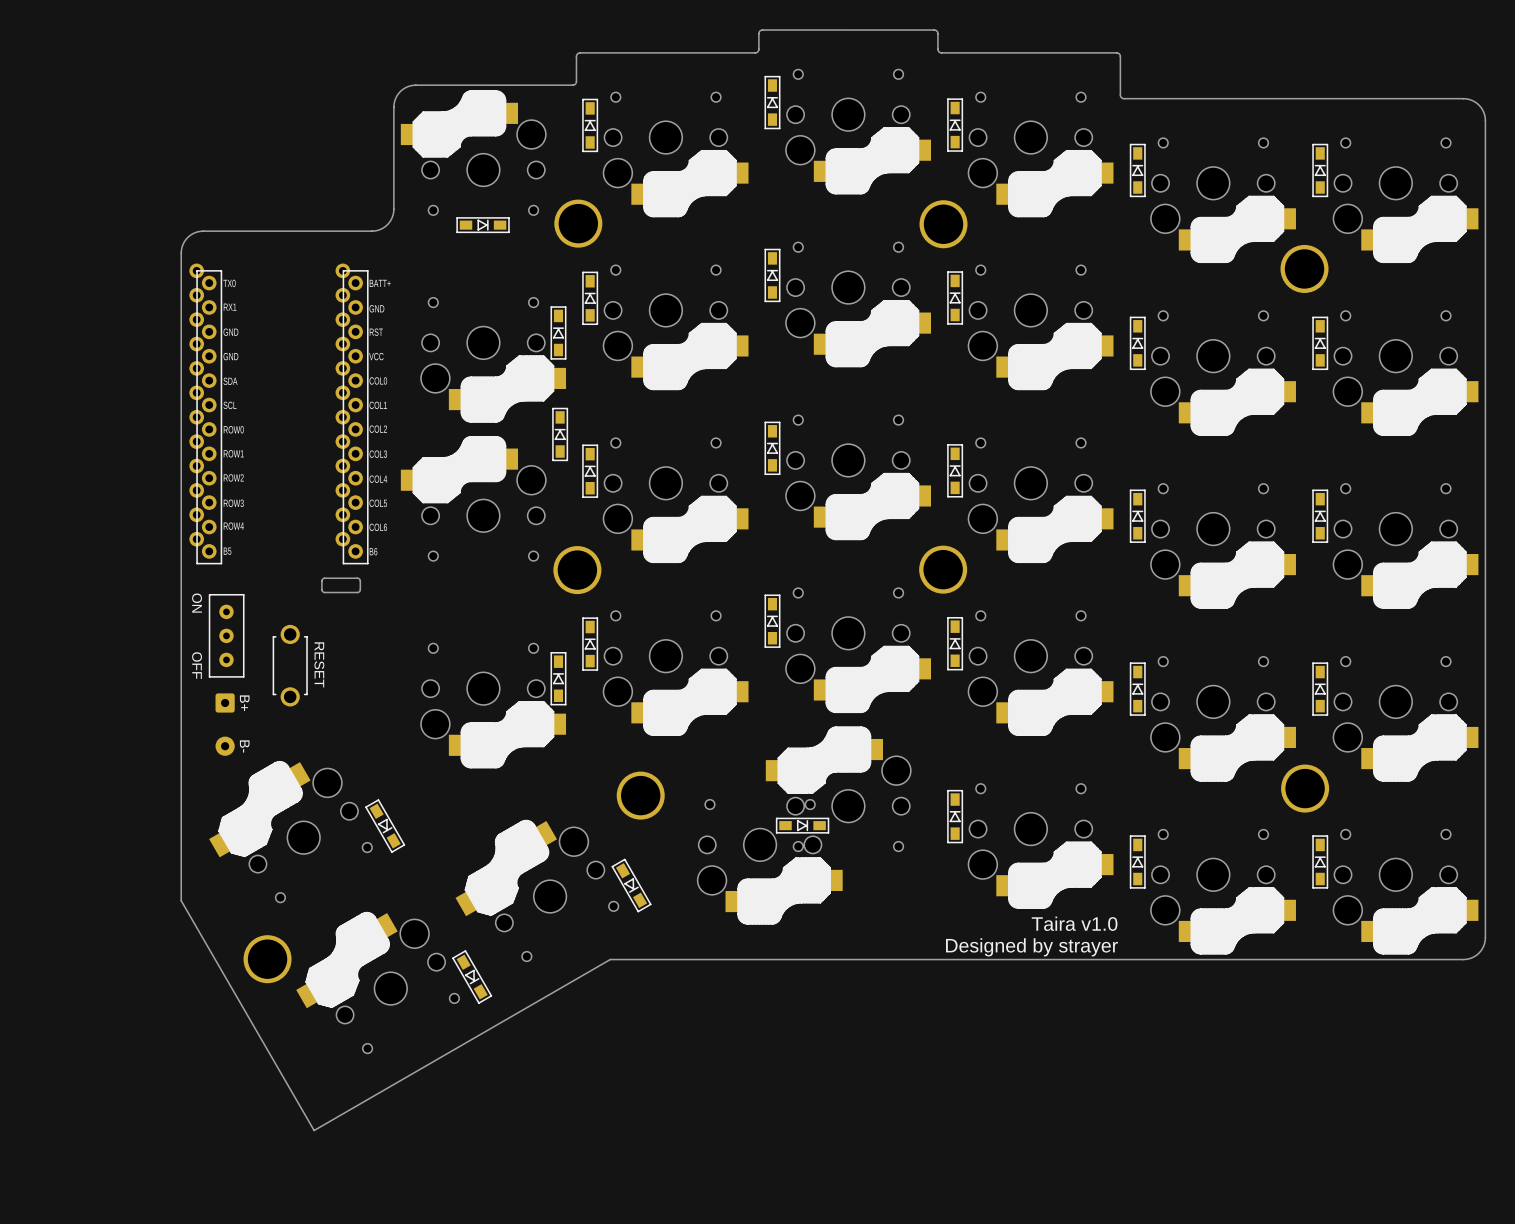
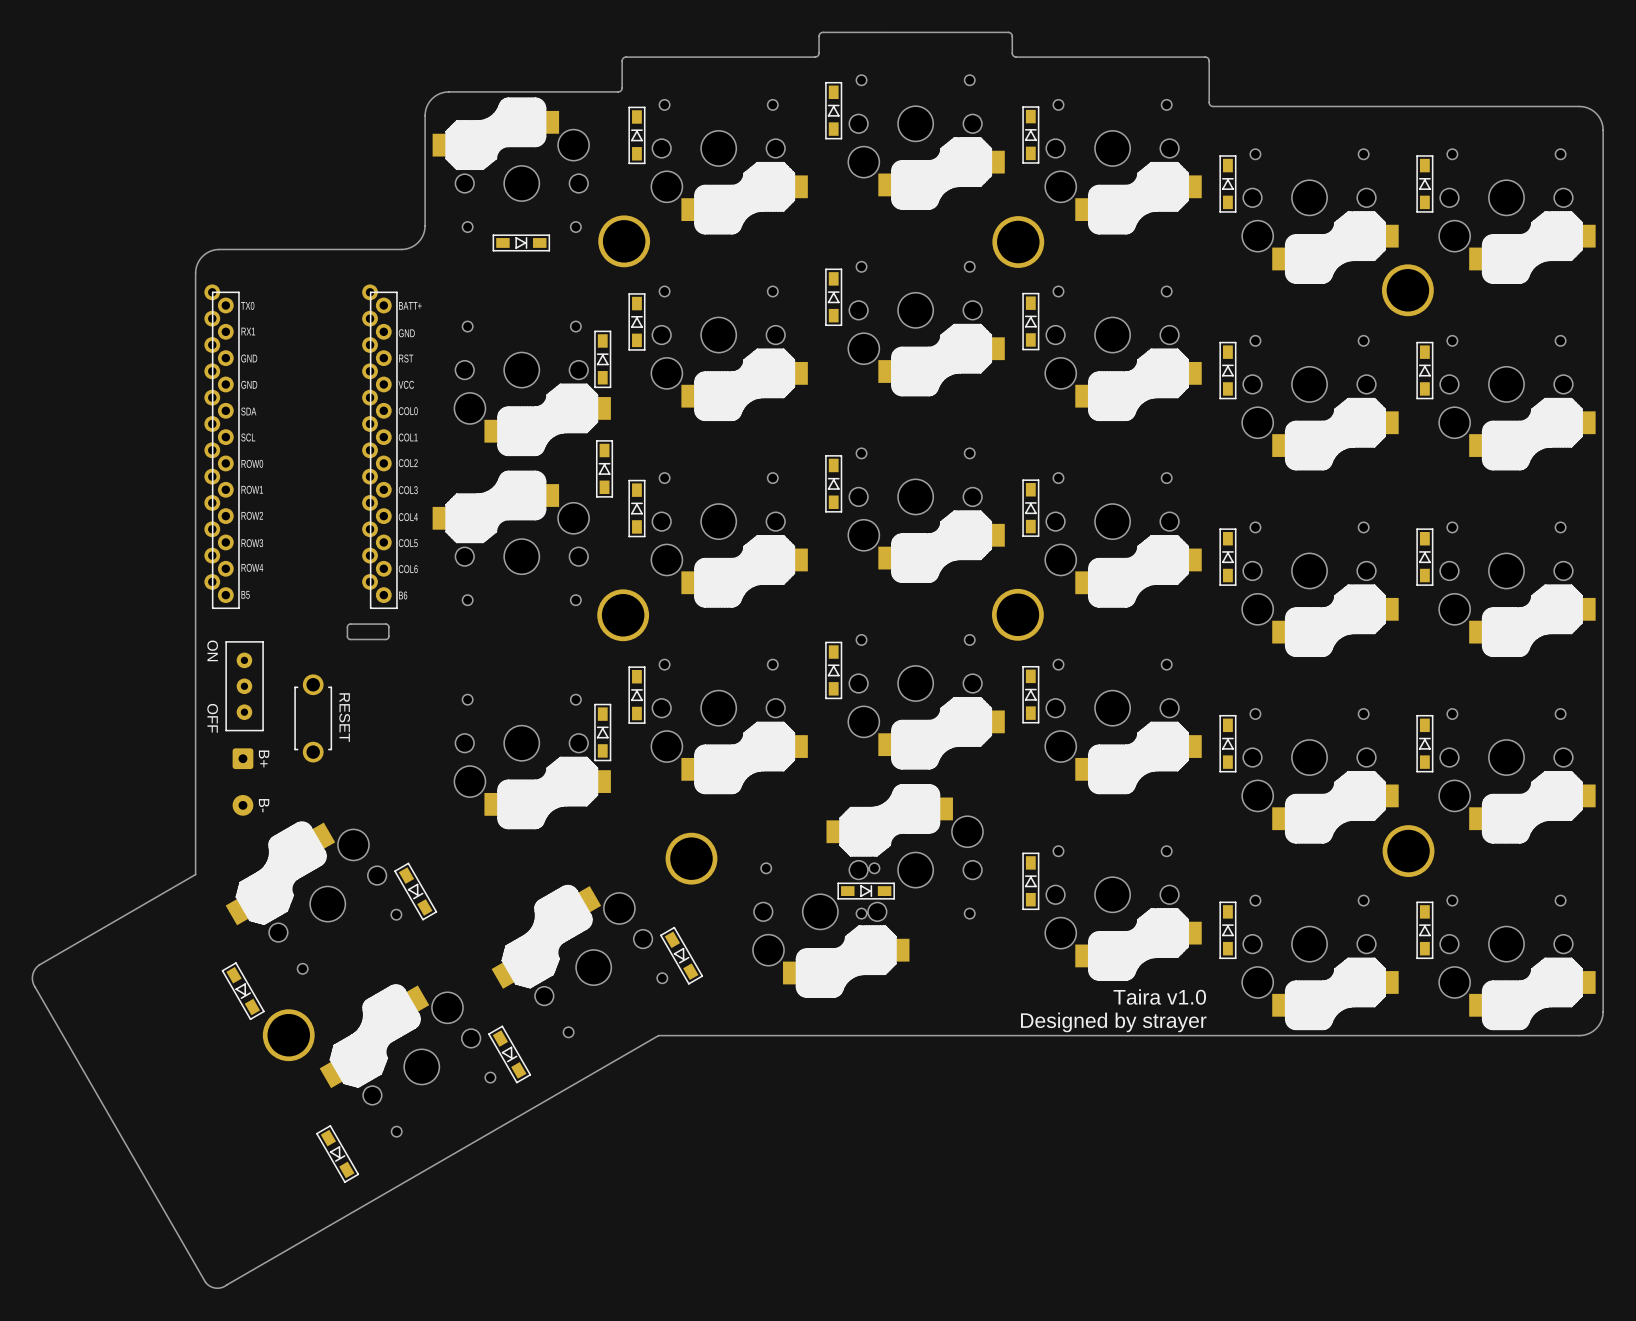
board edge: (181, 810) (181, 900) (314, 1130) (610, 959) -> (195, 874) (39, 965) (34, 970) (32, 979) (34, 985) (205, 1282) (212, 1287) (219, 1288) (225, 1285) (658, 1035)
part: none -> (243, 991)
part: none -> (337, 1154)

